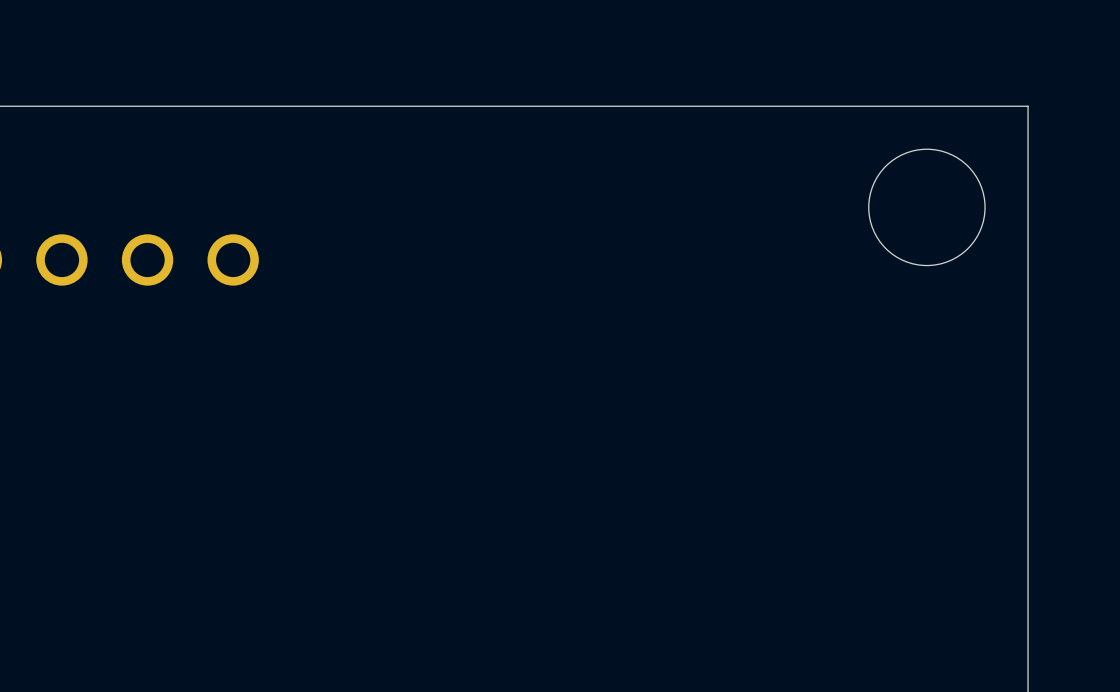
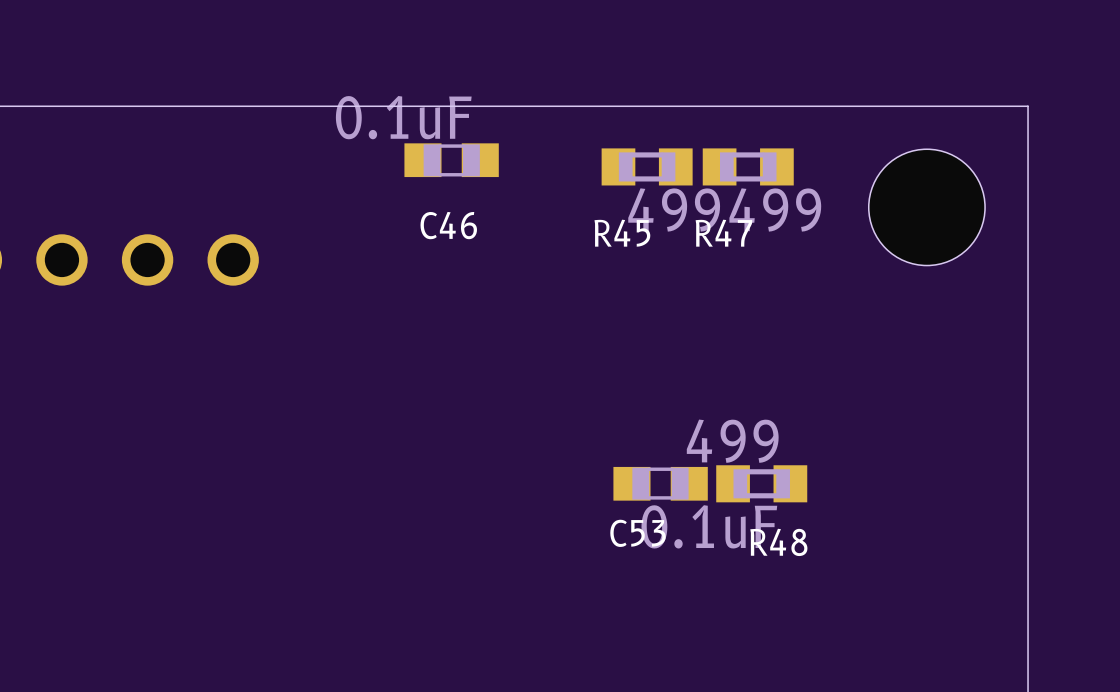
C46: none -> 0.1uF (451, 160)
R45: none -> 499 (647, 166)
R47: none -> 499 (748, 166)
C53: none -> 0.1uF (660, 483)
R48: none -> 499 (761, 483)

